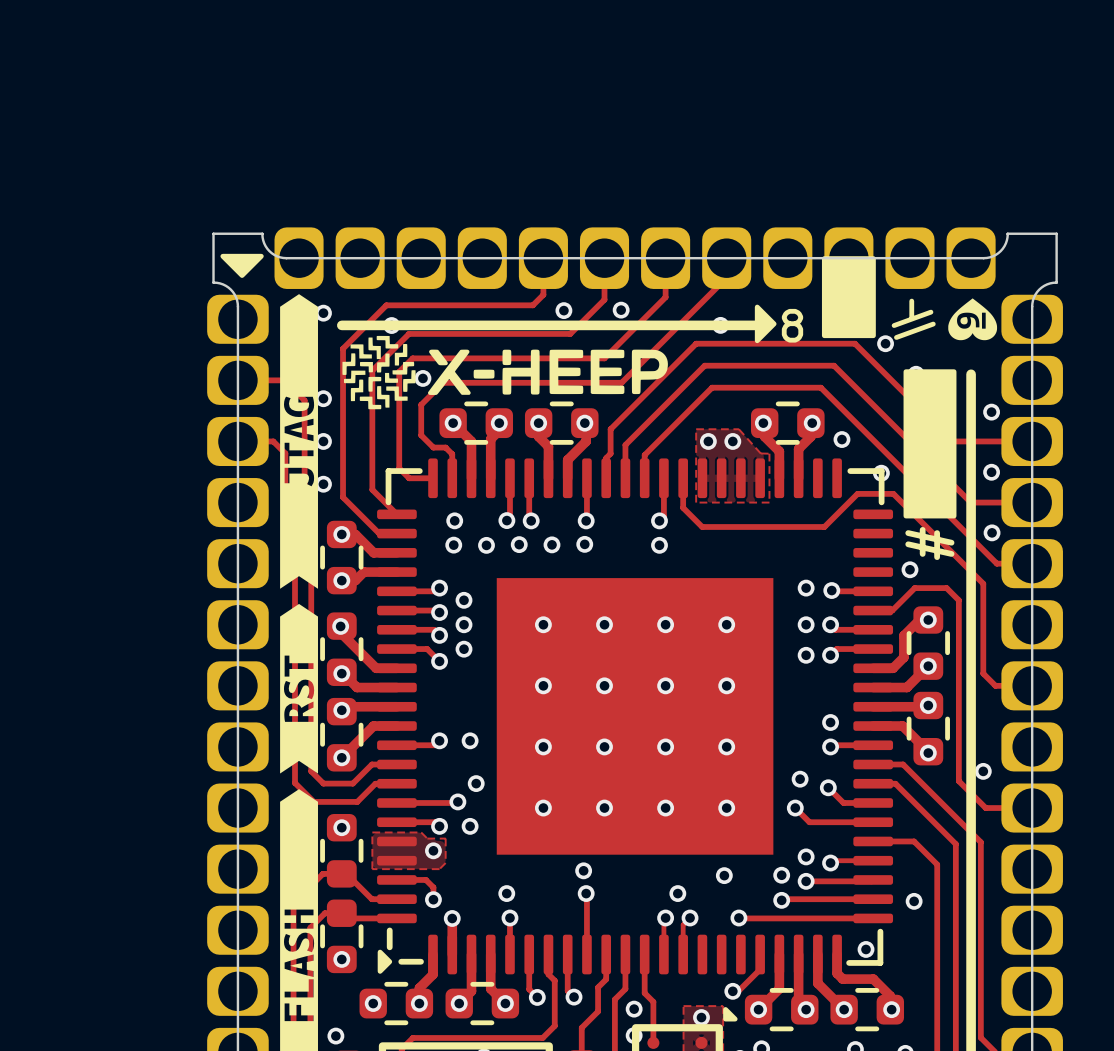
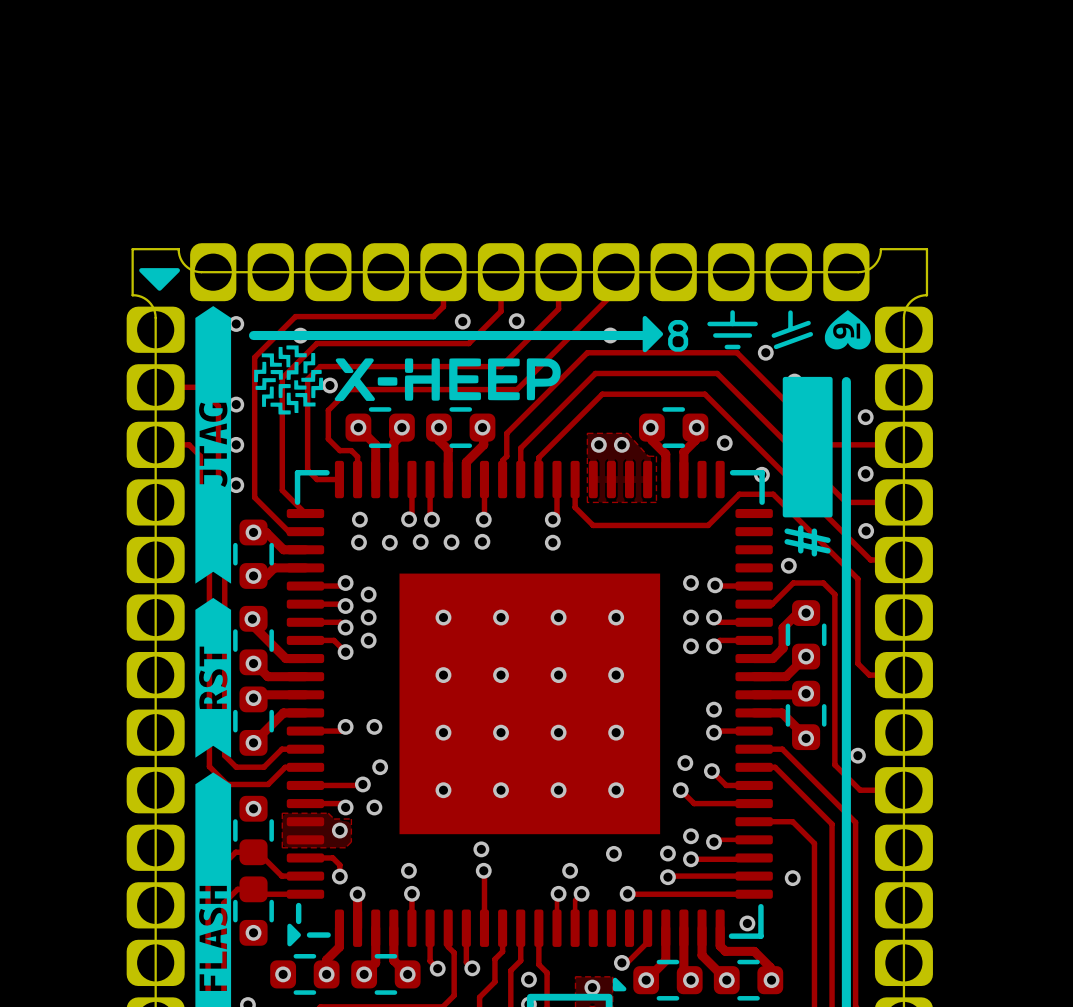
drawing: [821, 256, 876, 339] -> none
line: none -> (732, 312) (732, 323)
line: none -> (709, 323) (755, 323)
line: none -> (715, 335) (749, 335)
line: none -> (726, 346) (738, 346)

